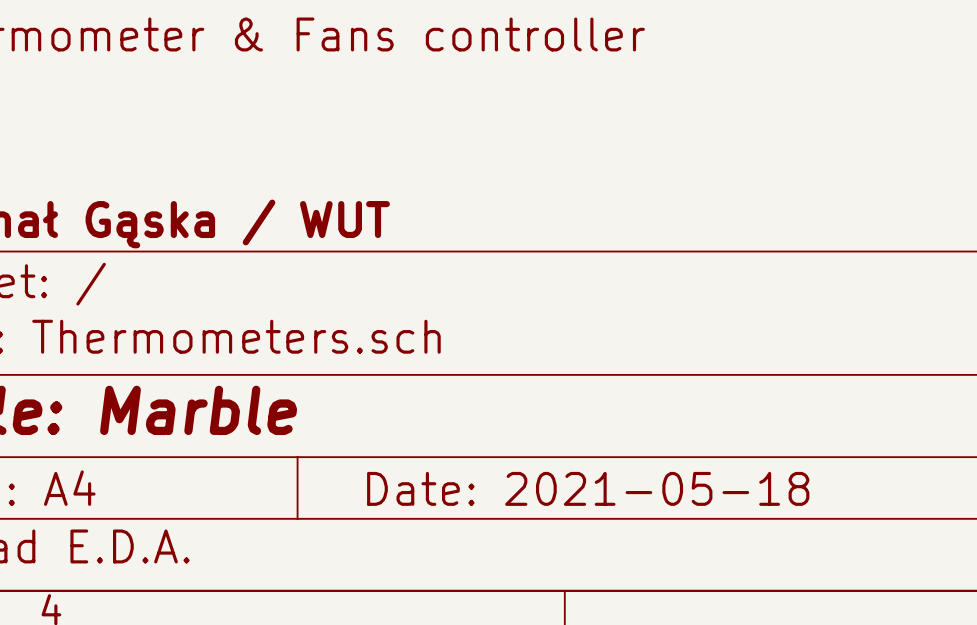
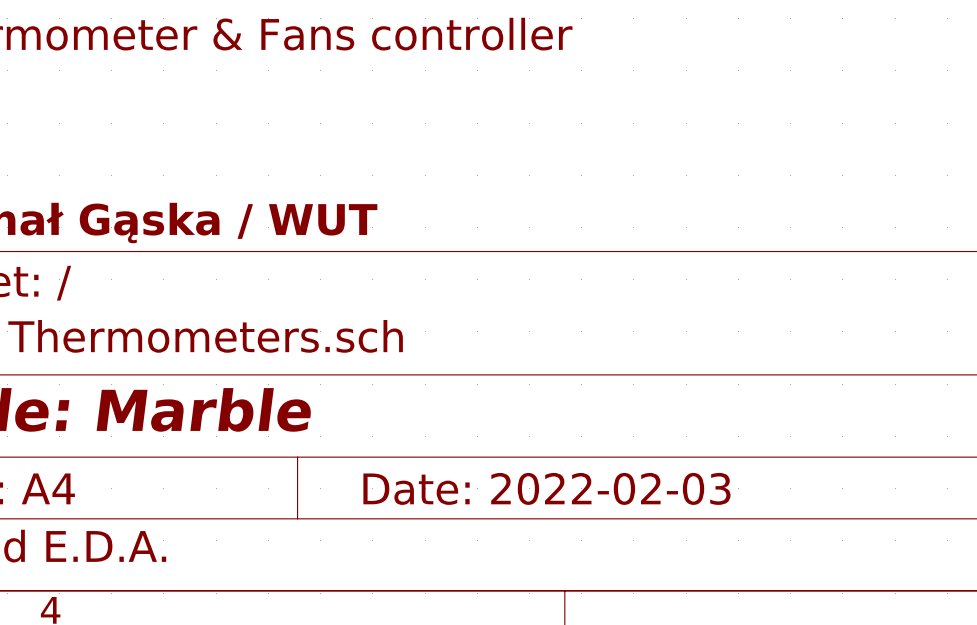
title block: Date: 2021-05-18 (588, 488) -> Date: 2022-02-03 (546, 488)

